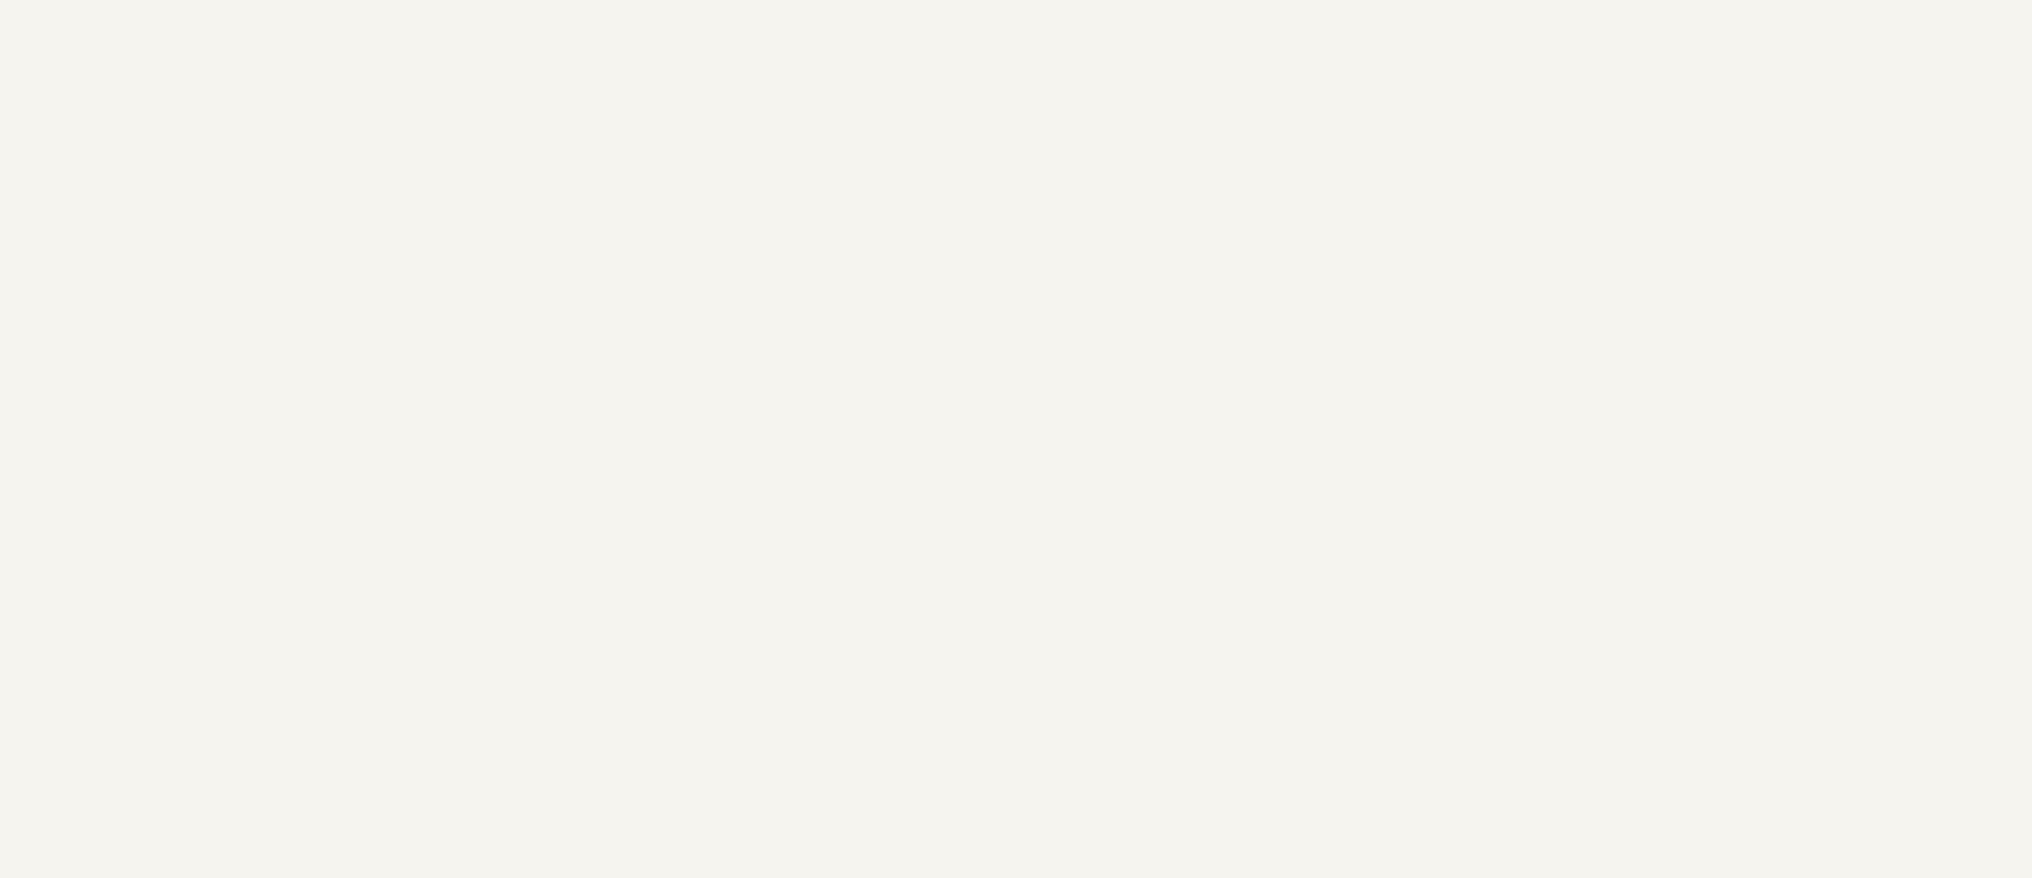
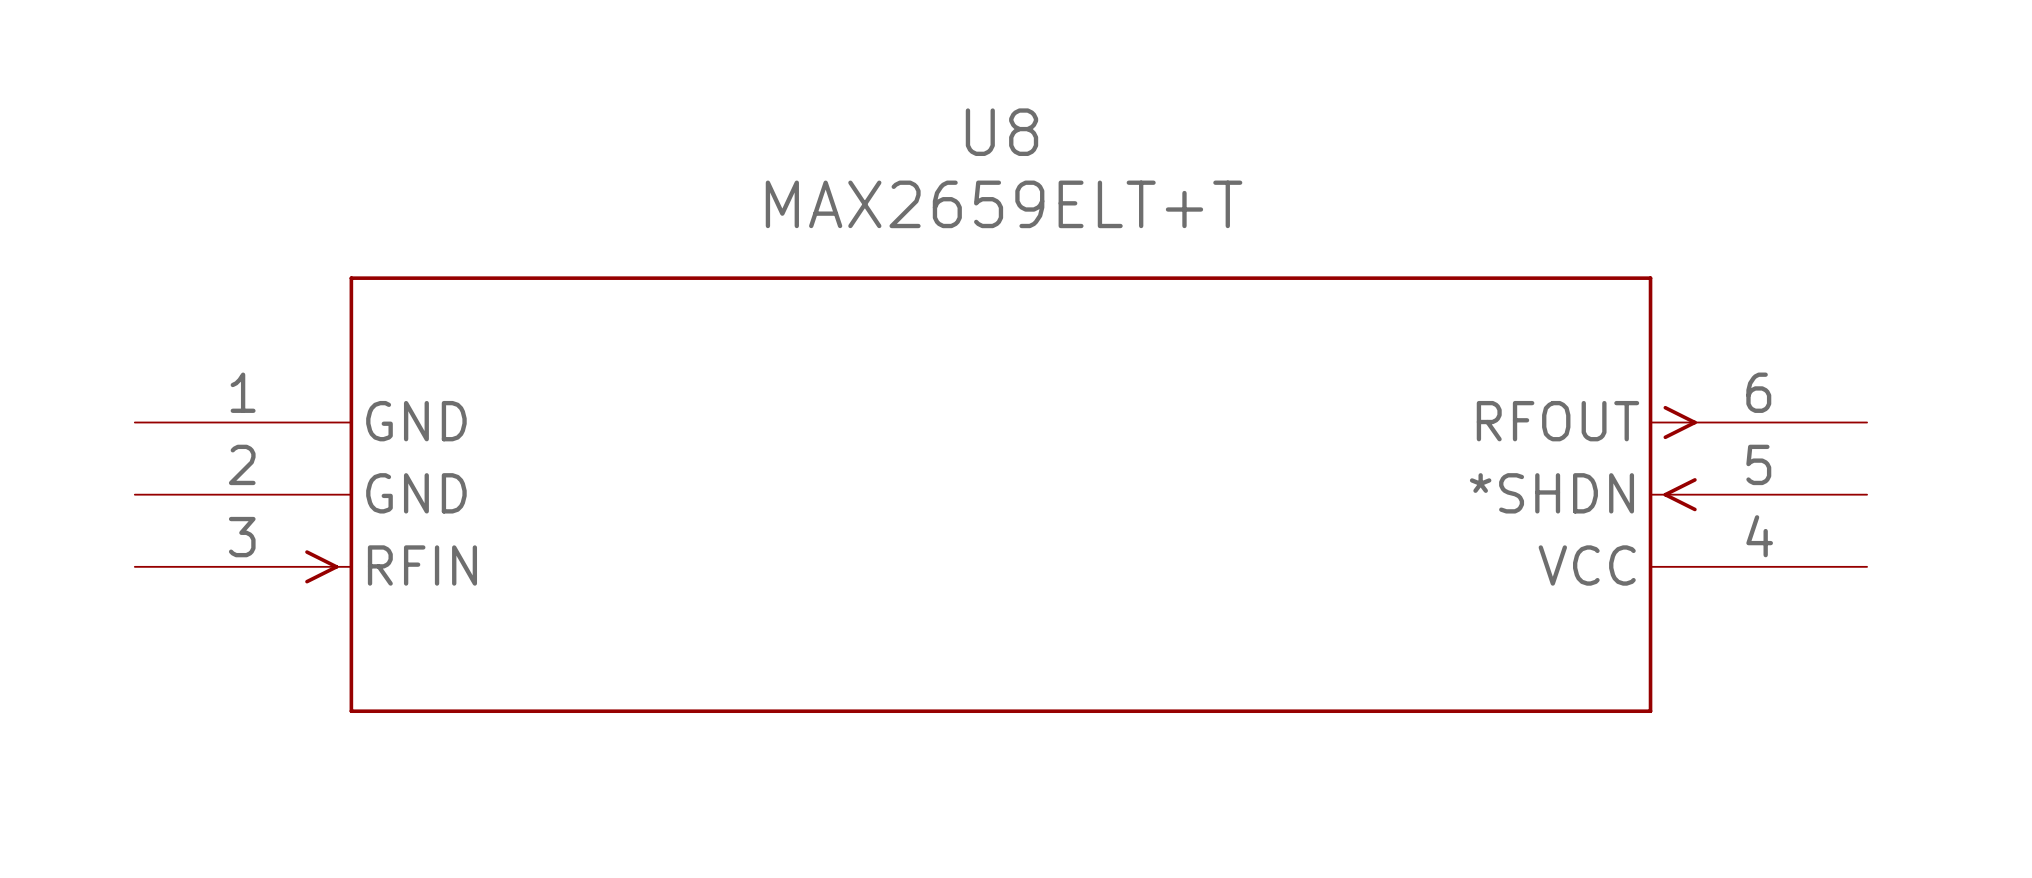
U8: none -> MAX2659ELT+T (1000, 494)

